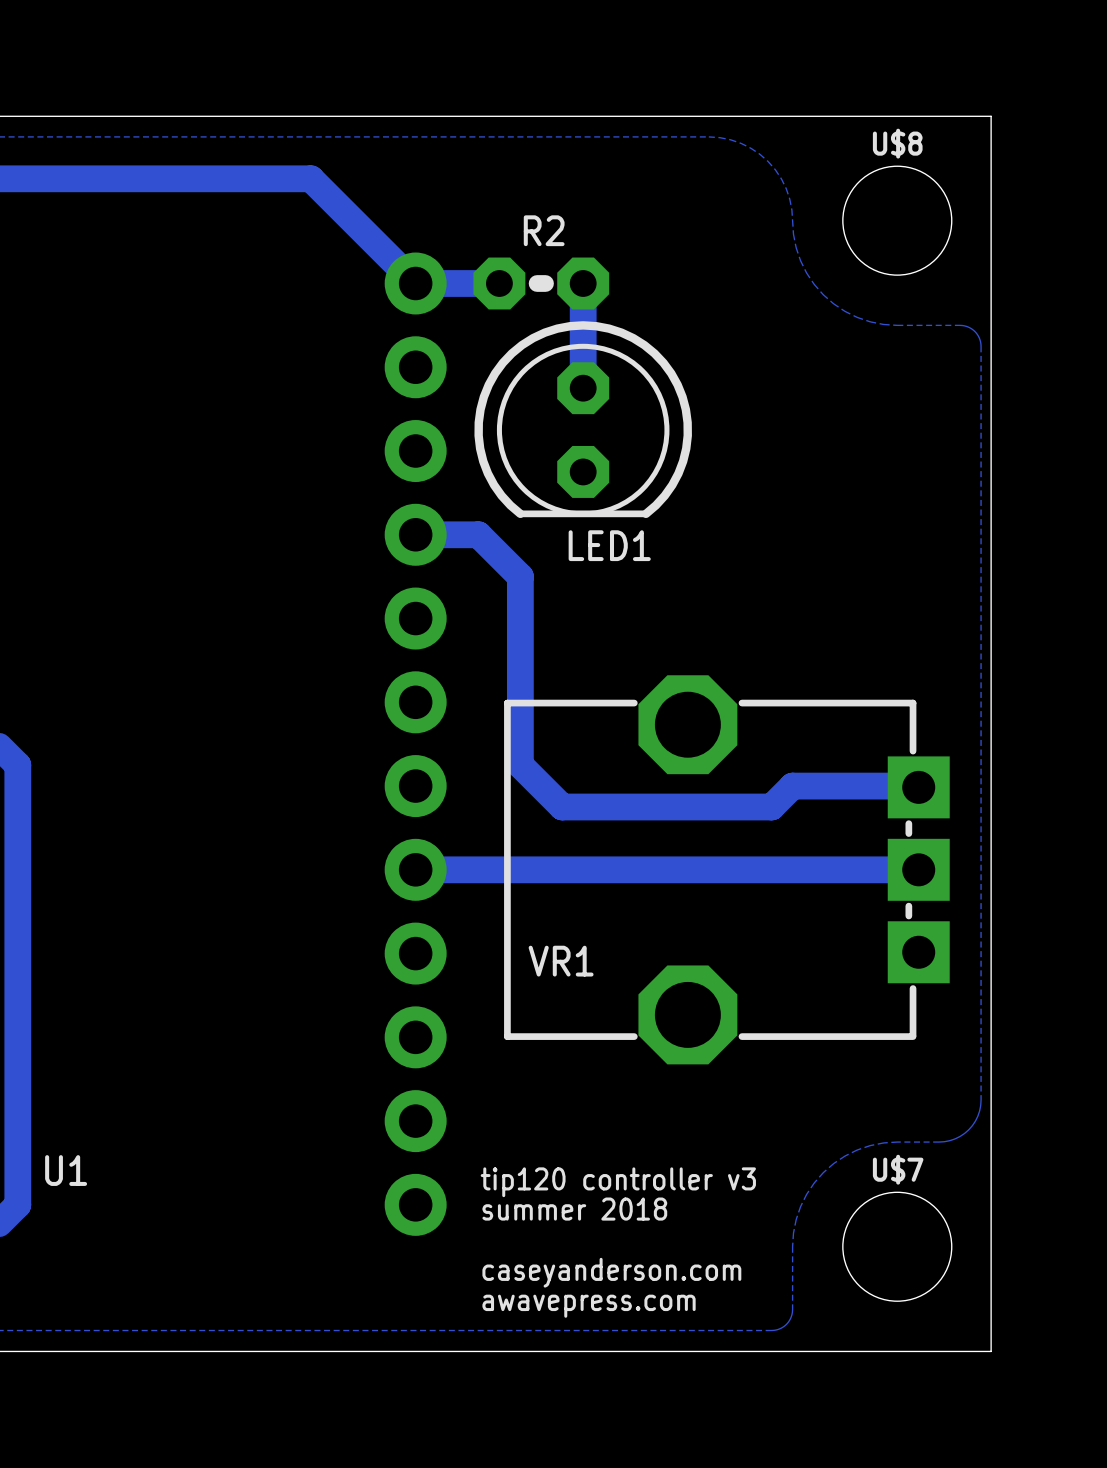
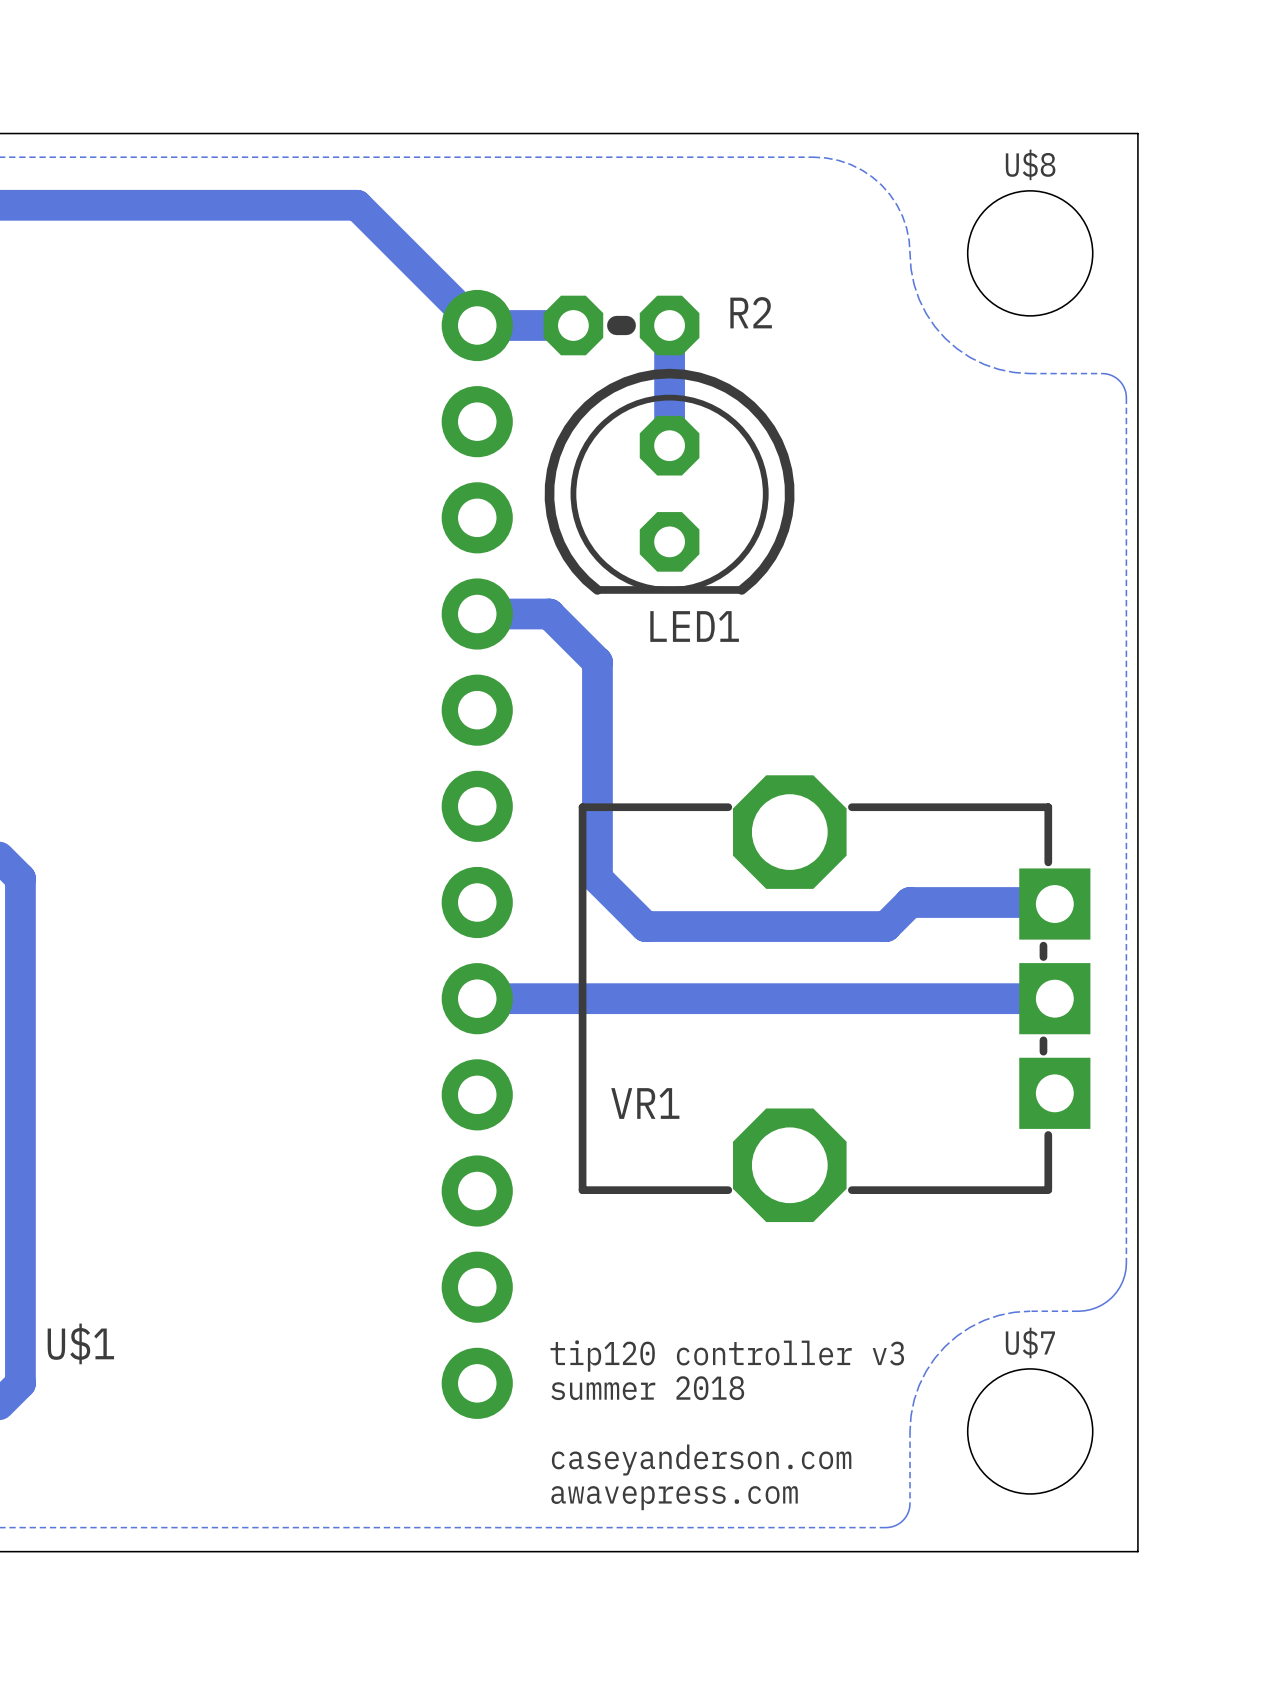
R2 name position: R2 (544, 230) -> R2 (751, 312)
U1 name: U1 (66, 1170) -> U$1 (80, 1343)

